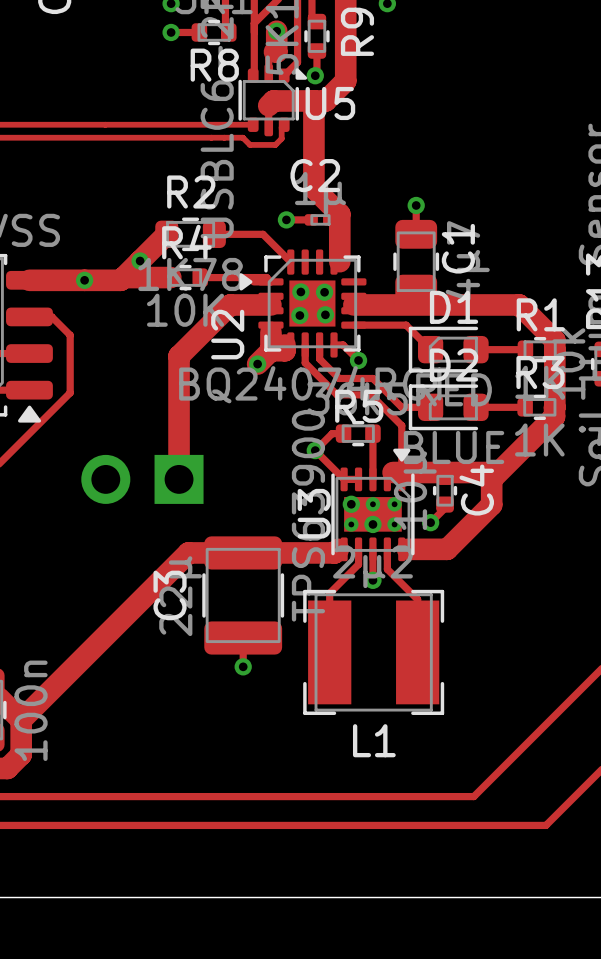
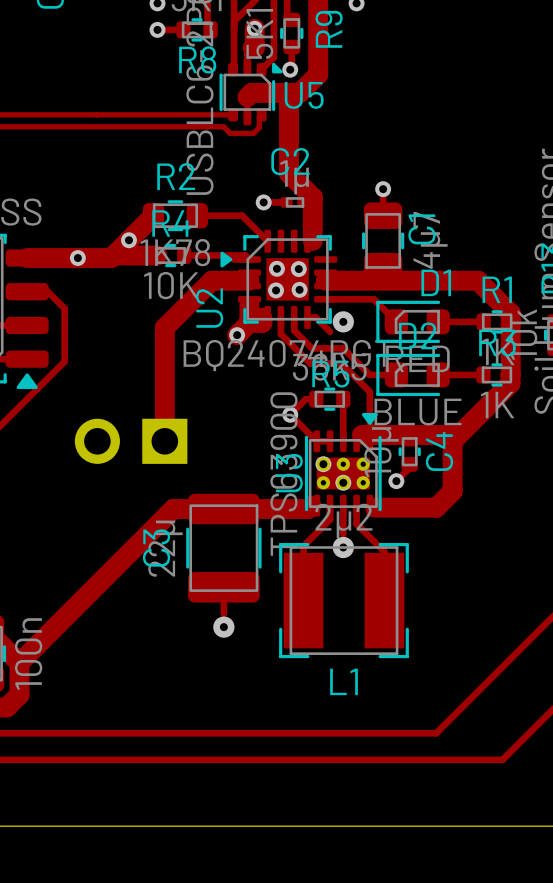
D1 name position: D1 (454, 307) -> D1 (436, 282)
via position: (358, 360) -> (343, 321)
track: (491, 504) (447, 549) (407, 549) -> (452, 464) (452, 491) (436, 507) (375, 507)
via position: (372, 580) -> (343, 547)
via position: (243, 666) -> (223, 627)

